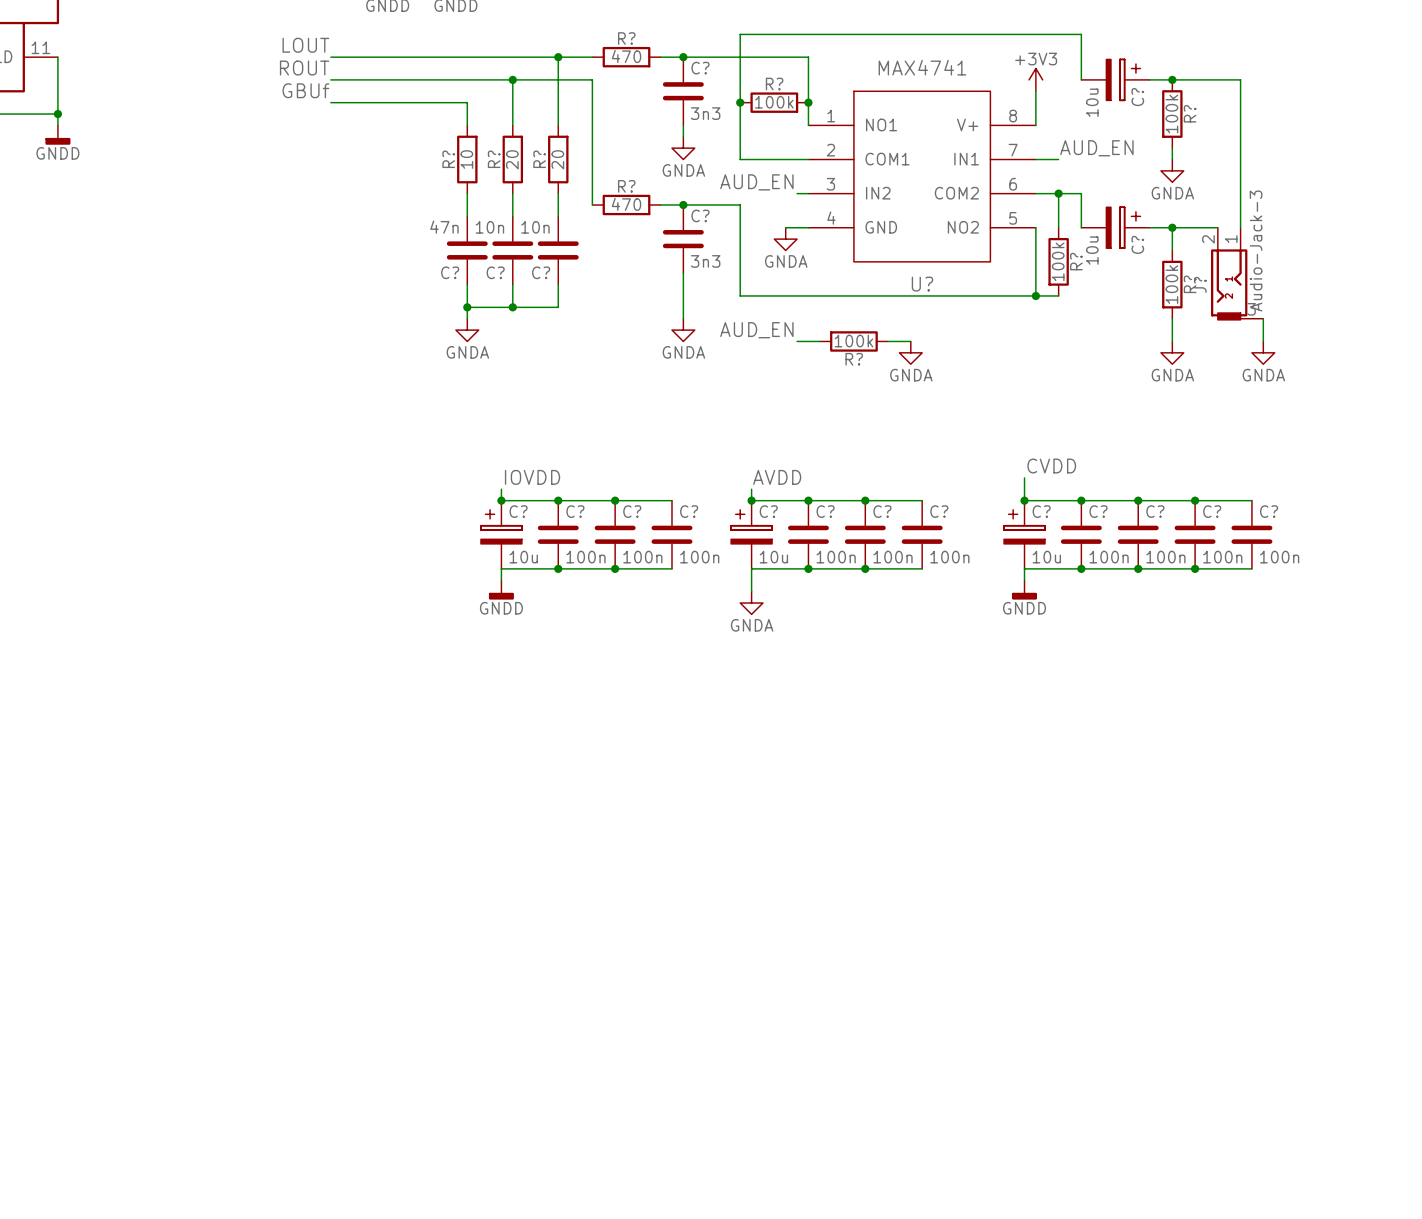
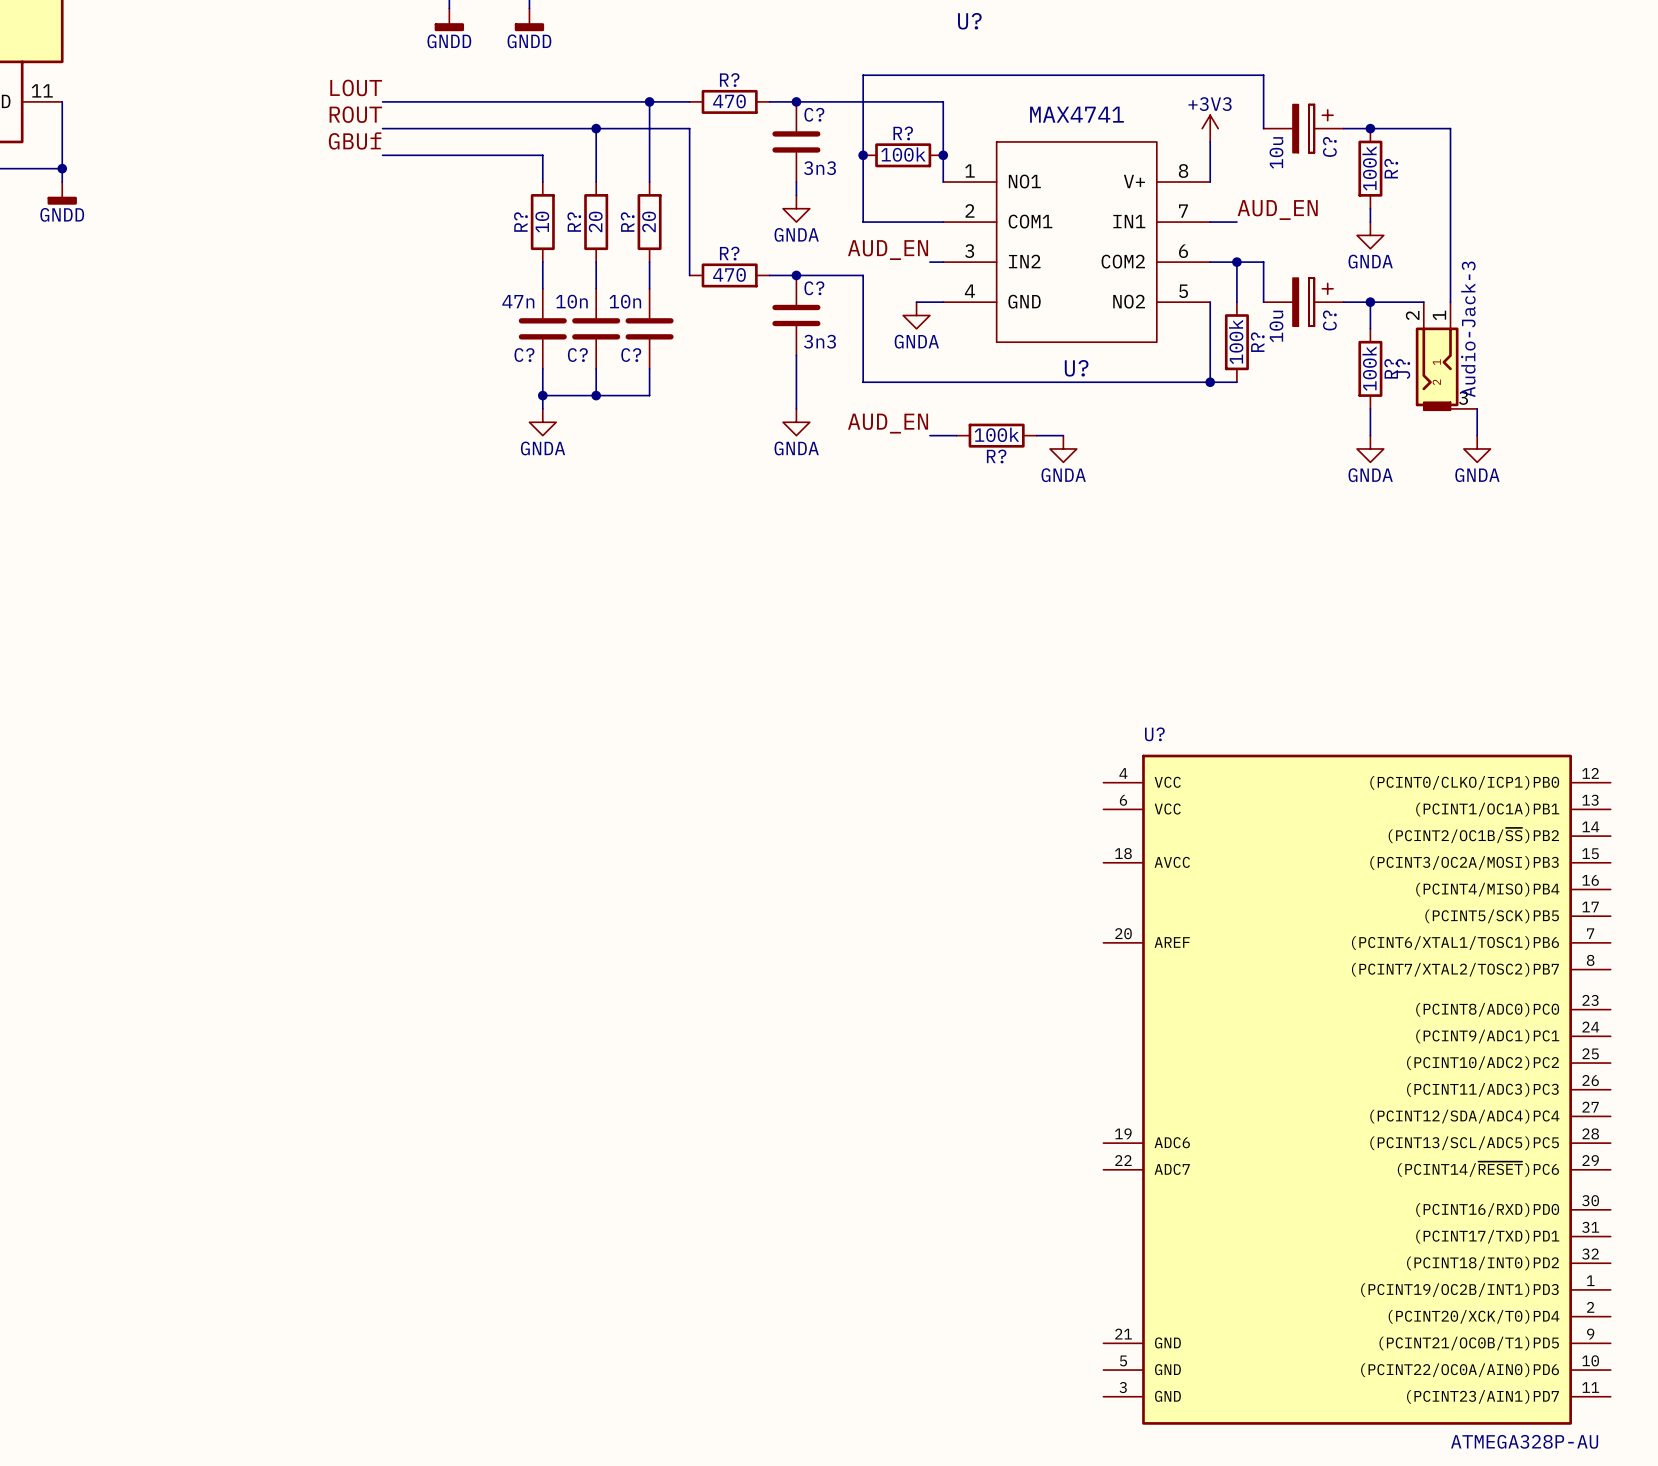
label: CVDD (1051, 466) -> none
label: IOVDD (532, 477) -> none
label: AVDD (777, 477) -> none
wire: (1024, 477) (1024, 500) (1251, 500) -> none
wire: (501, 489) (501, 500) (671, 500) -> none
wire: (751, 489) (751, 500) (922, 500) -> none
junction: (501, 500) -> none
junction: (558, 500) -> none
junction: (615, 500) -> none
junction: (751, 500) -> none
junction: (808, 500) -> none
junction: (865, 500) -> none
junction: (1024, 500) -> none
junction: (1081, 500) -> none
junction: (1138, 500) -> none
junction: (1195, 500) -> none
C?: 10u (501, 534) -> none
C?: 100n (558, 534) -> none
C?: 100n (615, 534) -> none
C?: 100n (671, 534) -> none
C?: 10u (751, 534) -> none
C?: 100n (808, 534) -> none
C?: 100n (865, 534) -> none
C?: 100n (922, 534) -> none
C?: 10u (1024, 534) -> none
C?: 100n (1081, 534) -> none
C?: 100n (1138, 534) -> none
C?: 100n (1195, 534) -> none
C?: 100n (1251, 534) -> none
junction: (558, 568) -> none
junction: (615, 568) -> none
wire: (671, 568) (501, 568) (501, 580) -> none
junction: (808, 568) -> none
junction: (865, 568) -> none
wire: (922, 568) (751, 568) (751, 591) -> none
junction: (1081, 568) -> none
junction: (1138, 568) -> none
junction: (1195, 568) -> none
wire: (1251, 568) (1024, 568) (1024, 580) -> none
power symbol: GNDD (501, 589) -> none
power symbol: GNDD (1024, 589) -> none
power symbol: GNDA (751, 603) -> none
U?: none -> ATMEGA328P-AU (1357, 1089)

